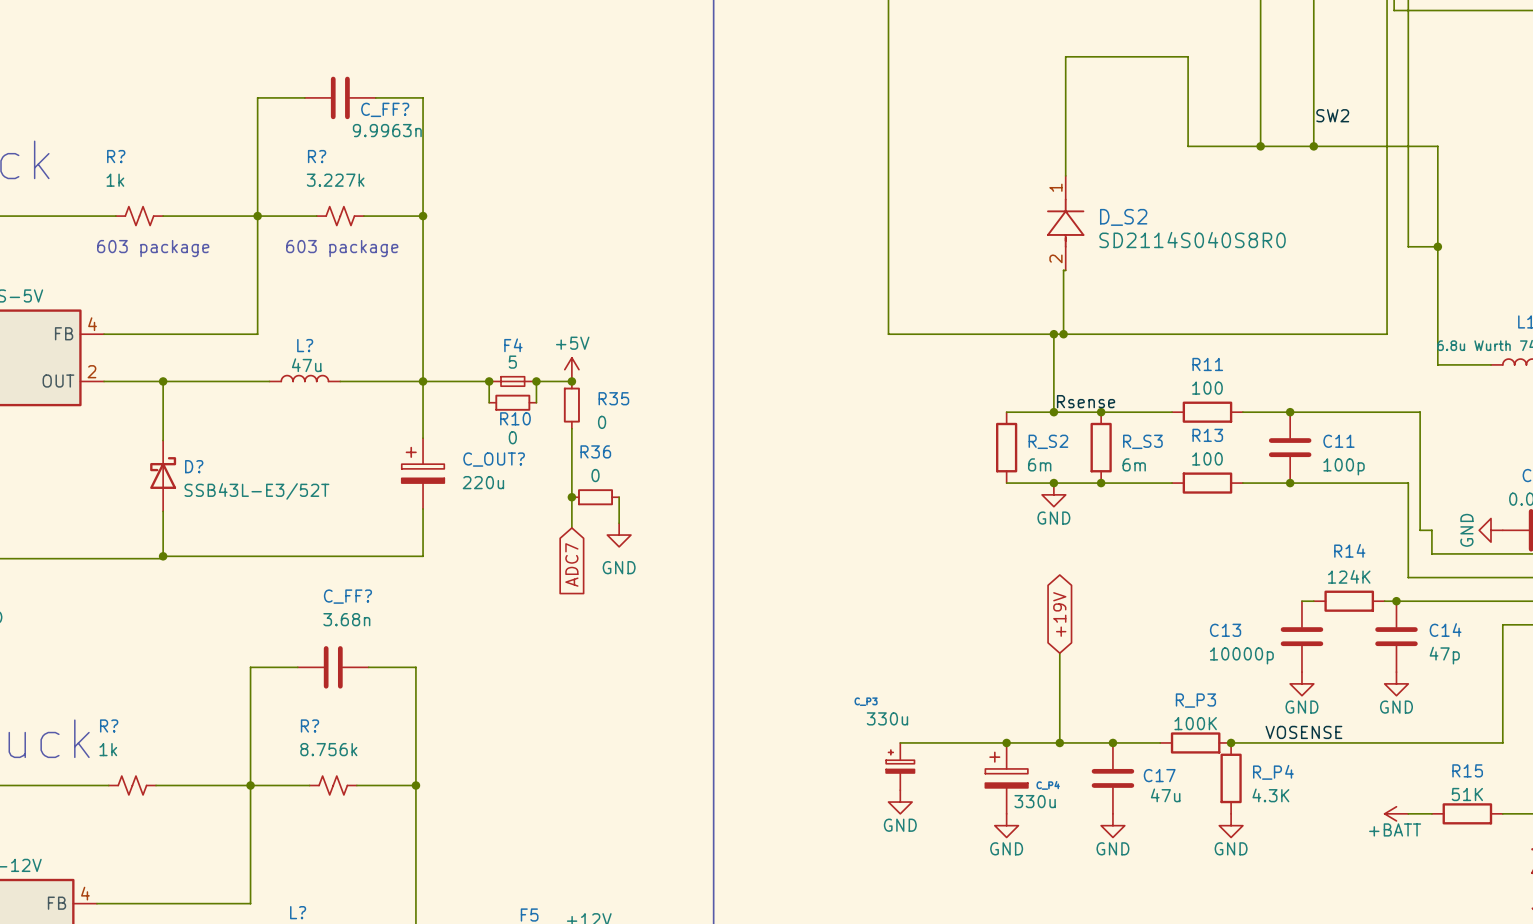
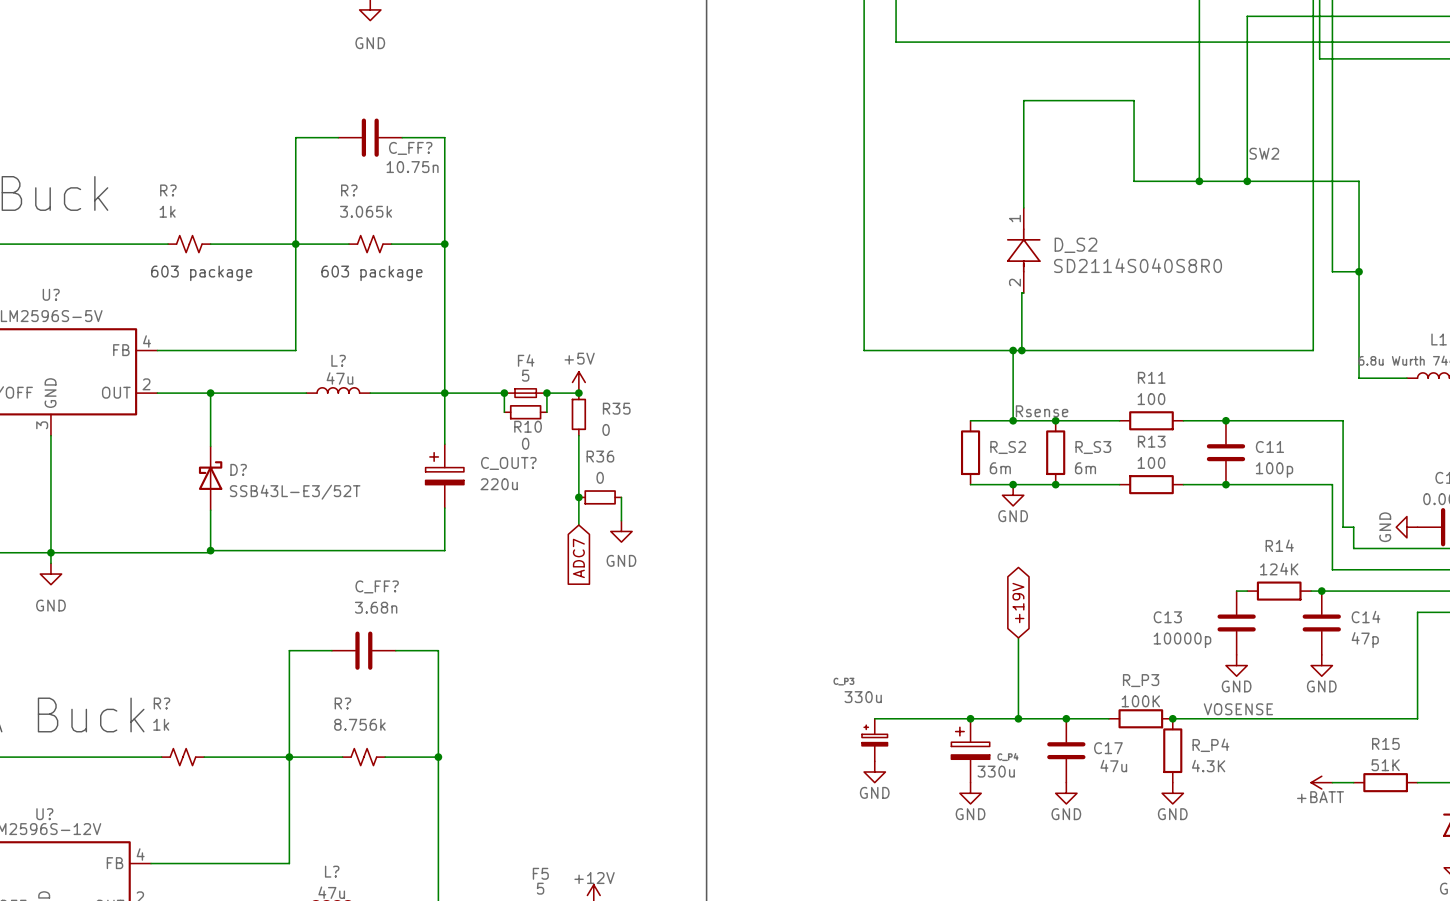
C_FF? value: 9.9963n (387, 130) -> 10.75n (412, 167)
R? value: 3.227k (335, 180) -> 3.065k (366, 211)

